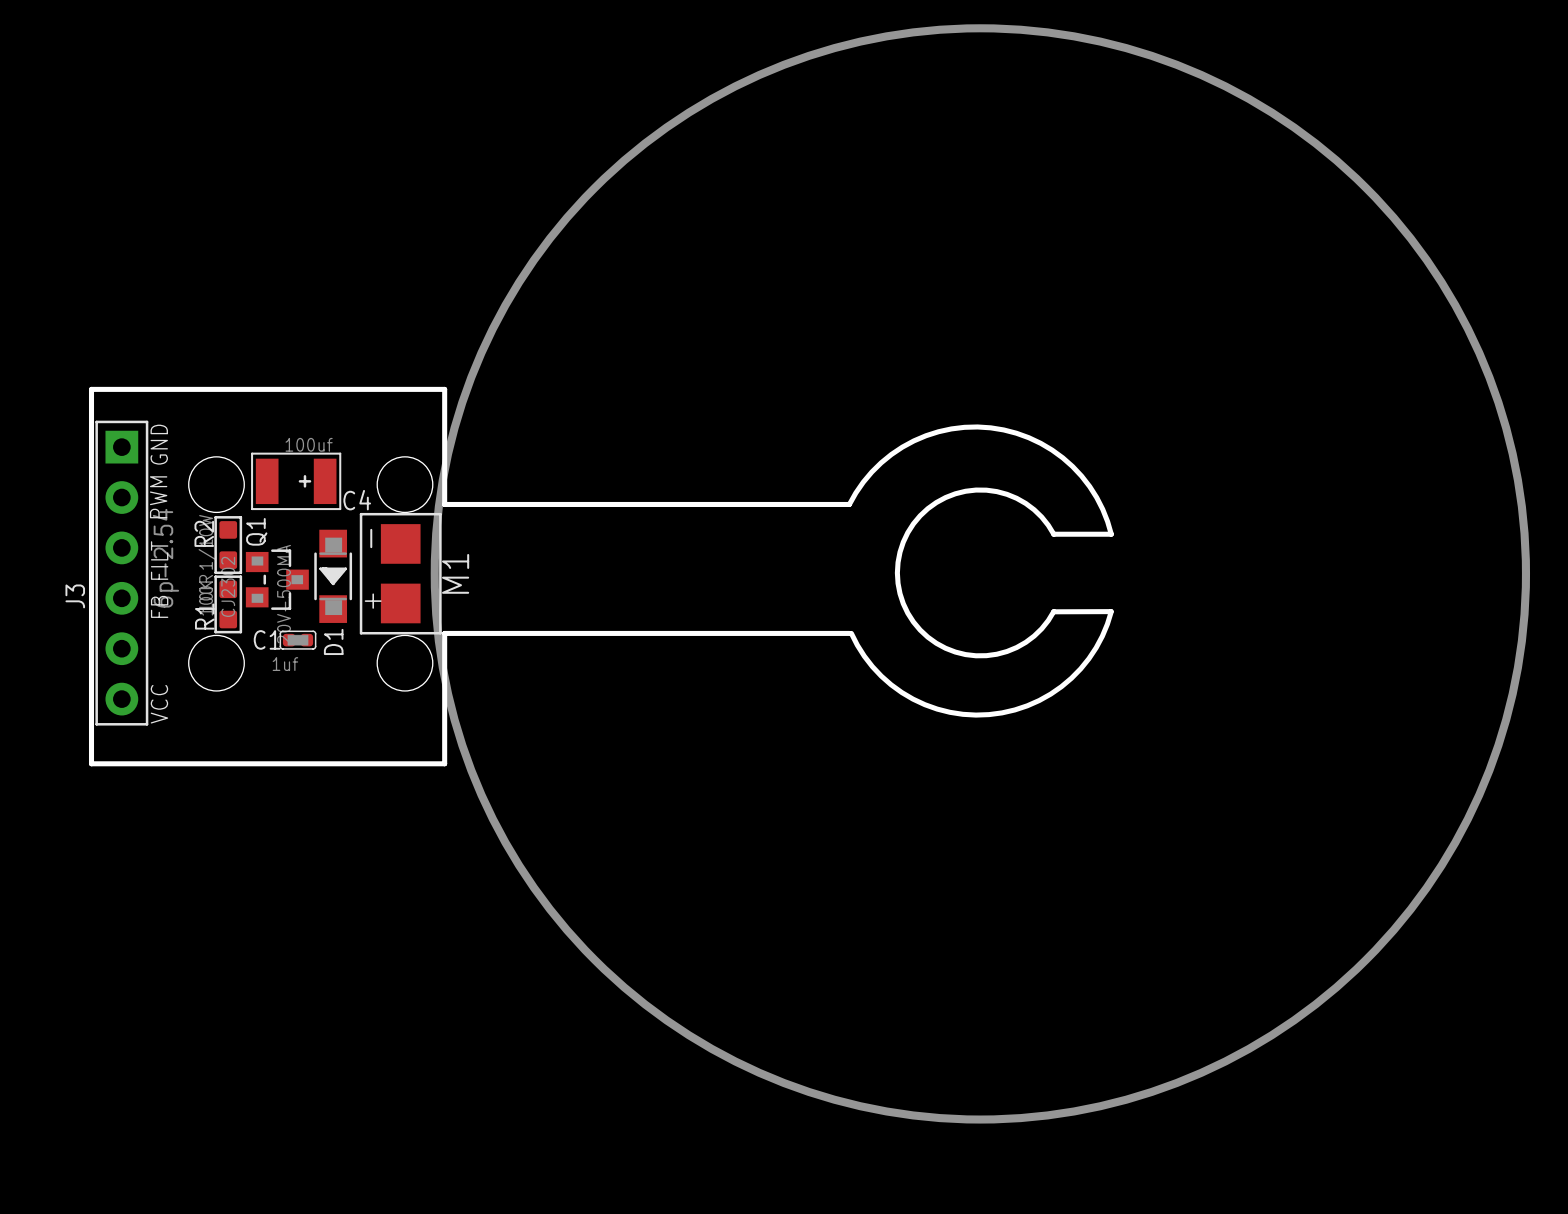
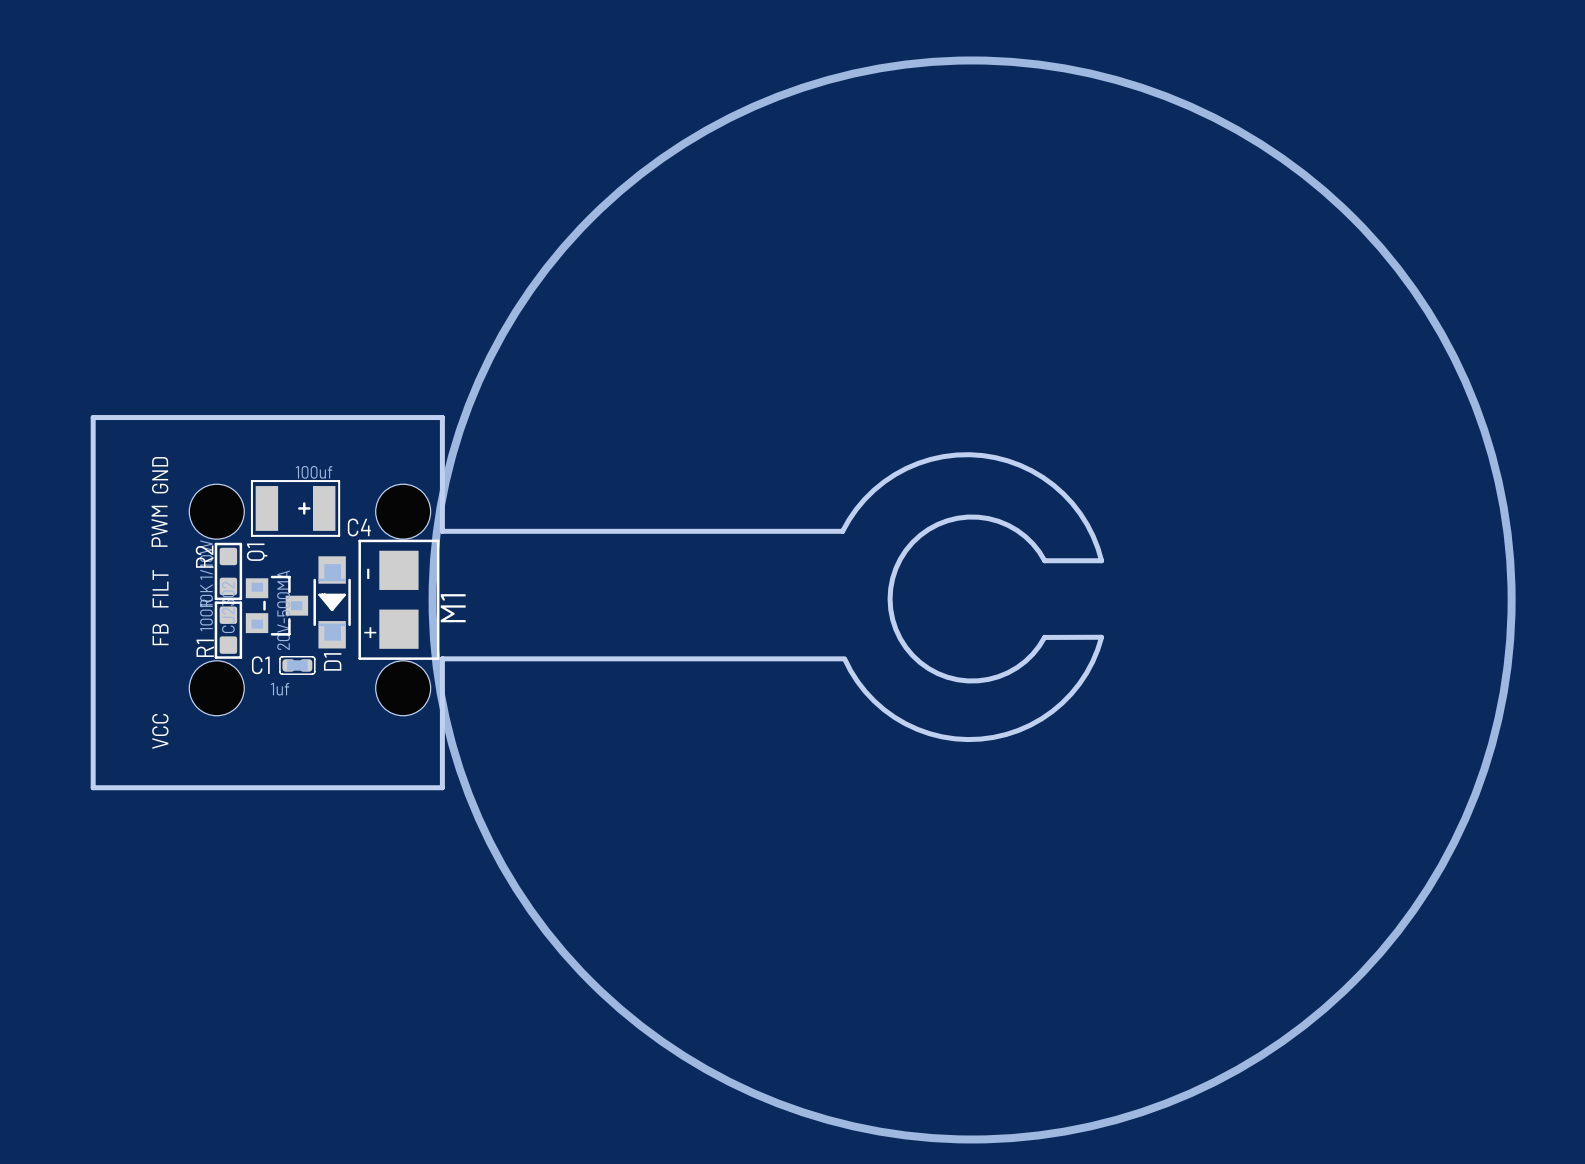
J3: 6p-2.54 (121, 573) -> none

